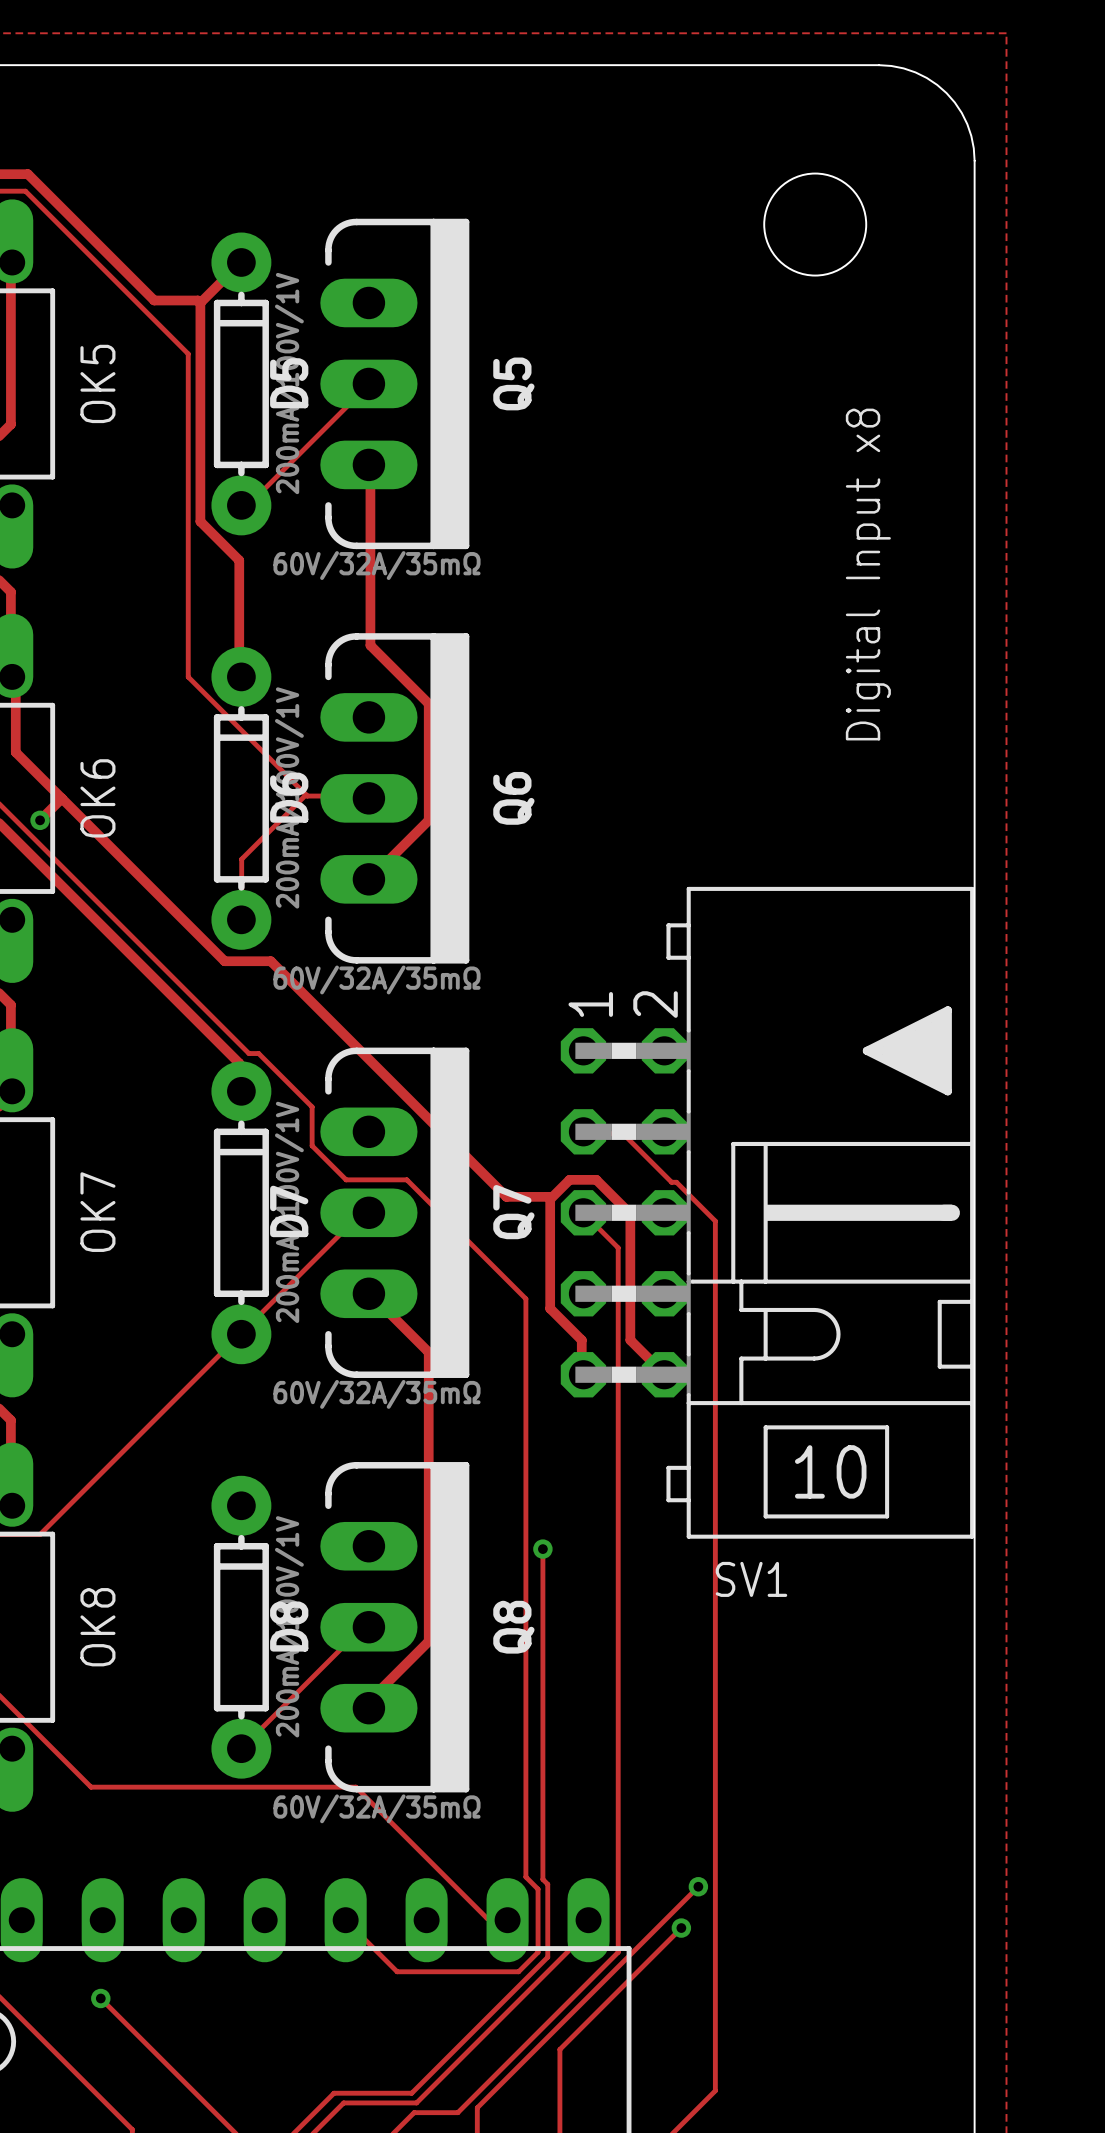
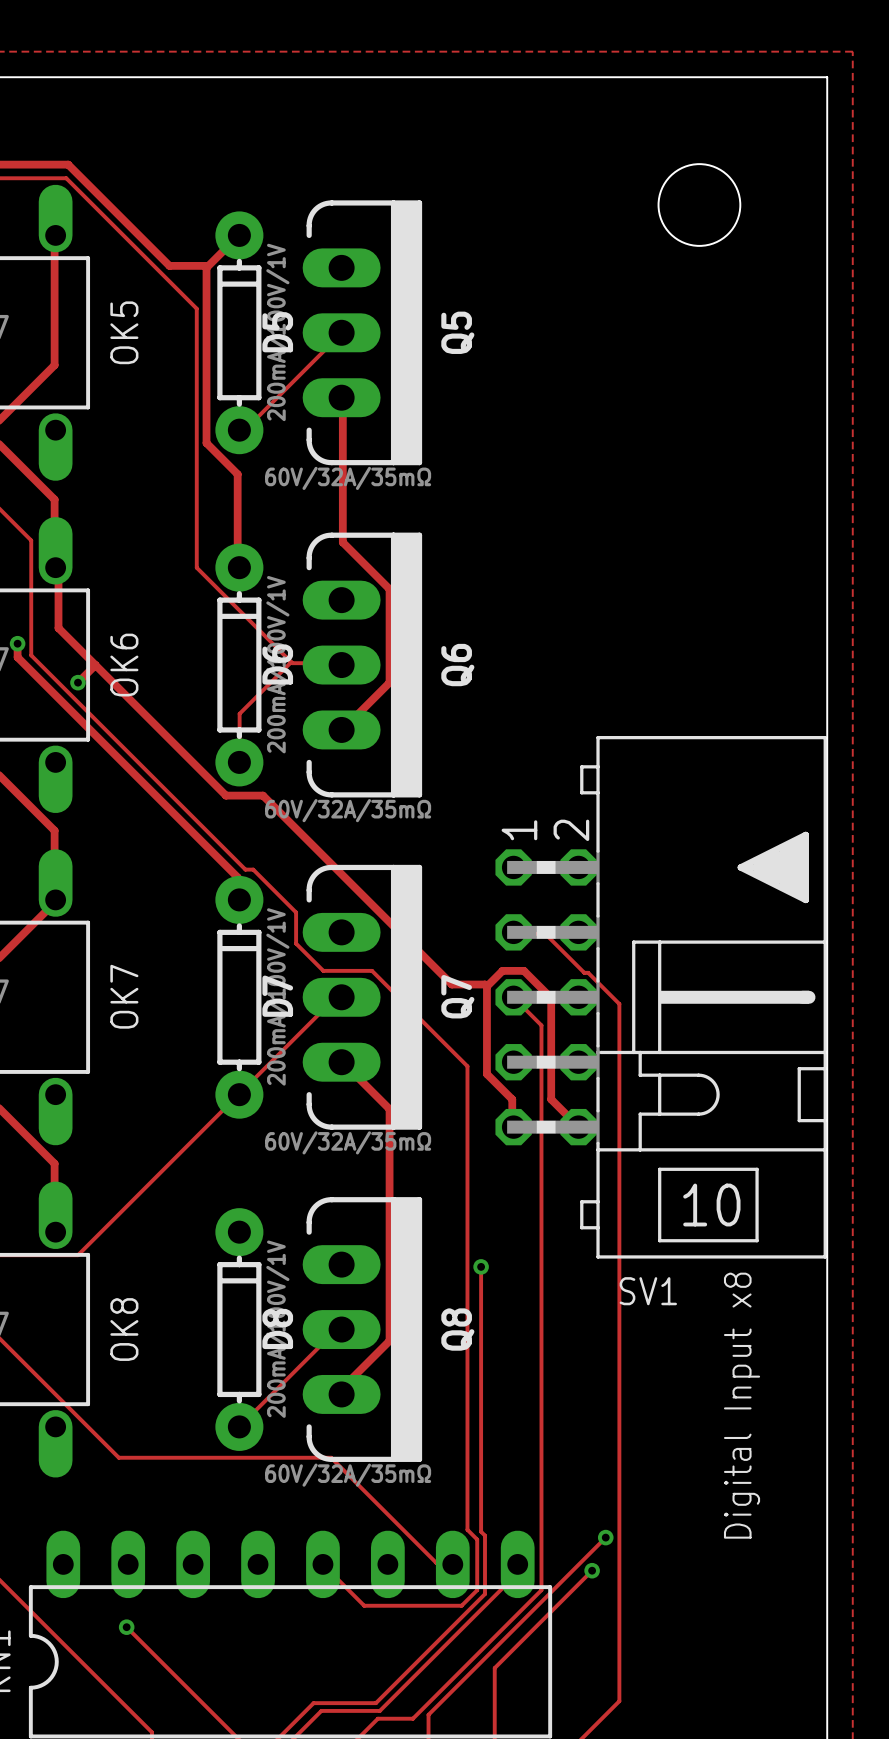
board edge: (878, 65) (903, 68) (915, 72) (937, 84) (946, 93) (954, 102) (967, 124) (971, 136) (974, 160) -> (750, 77) (827, 77) (827, 153)
text: Digital Input x8 (868, 574) -> none
text: none -> Digital Input x8 (742, 1405)

